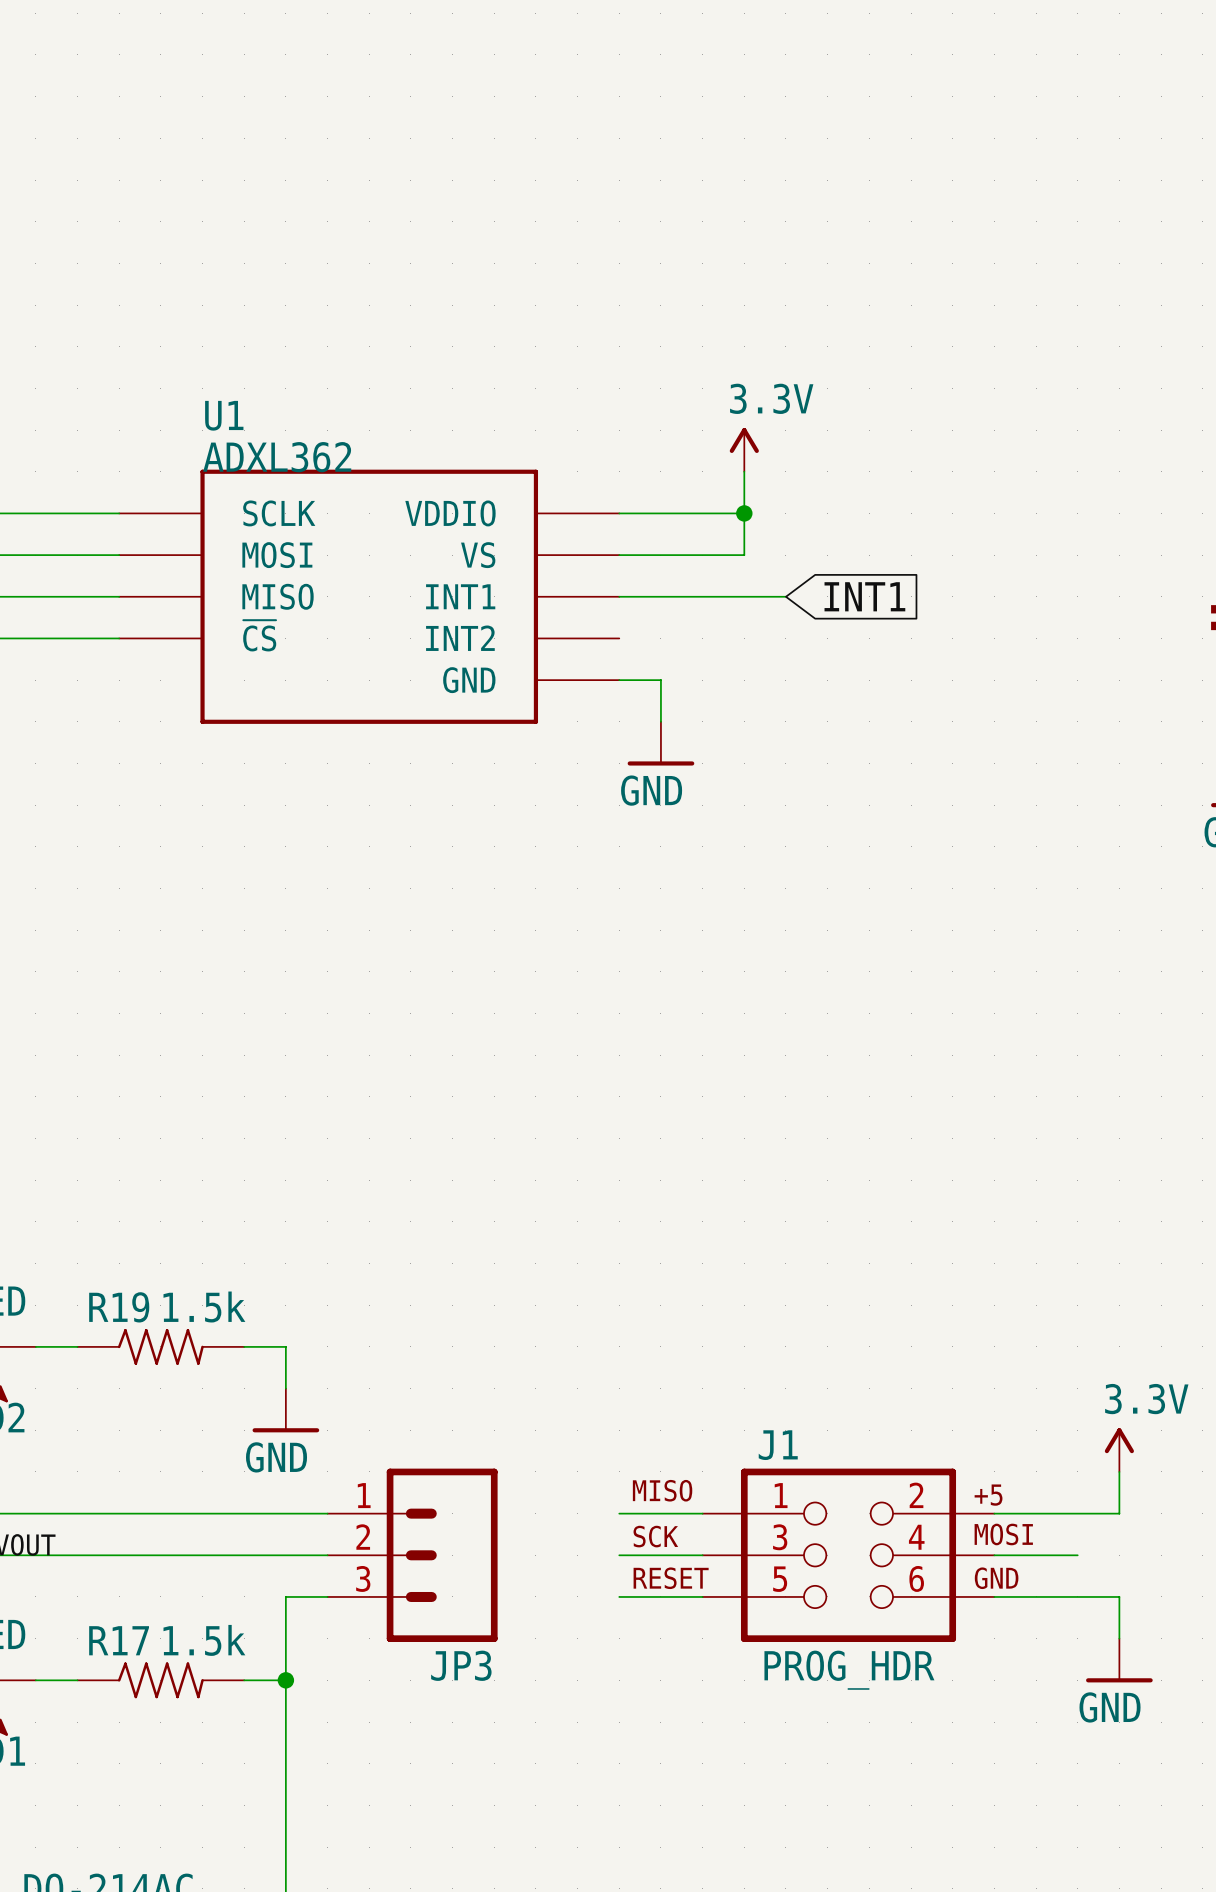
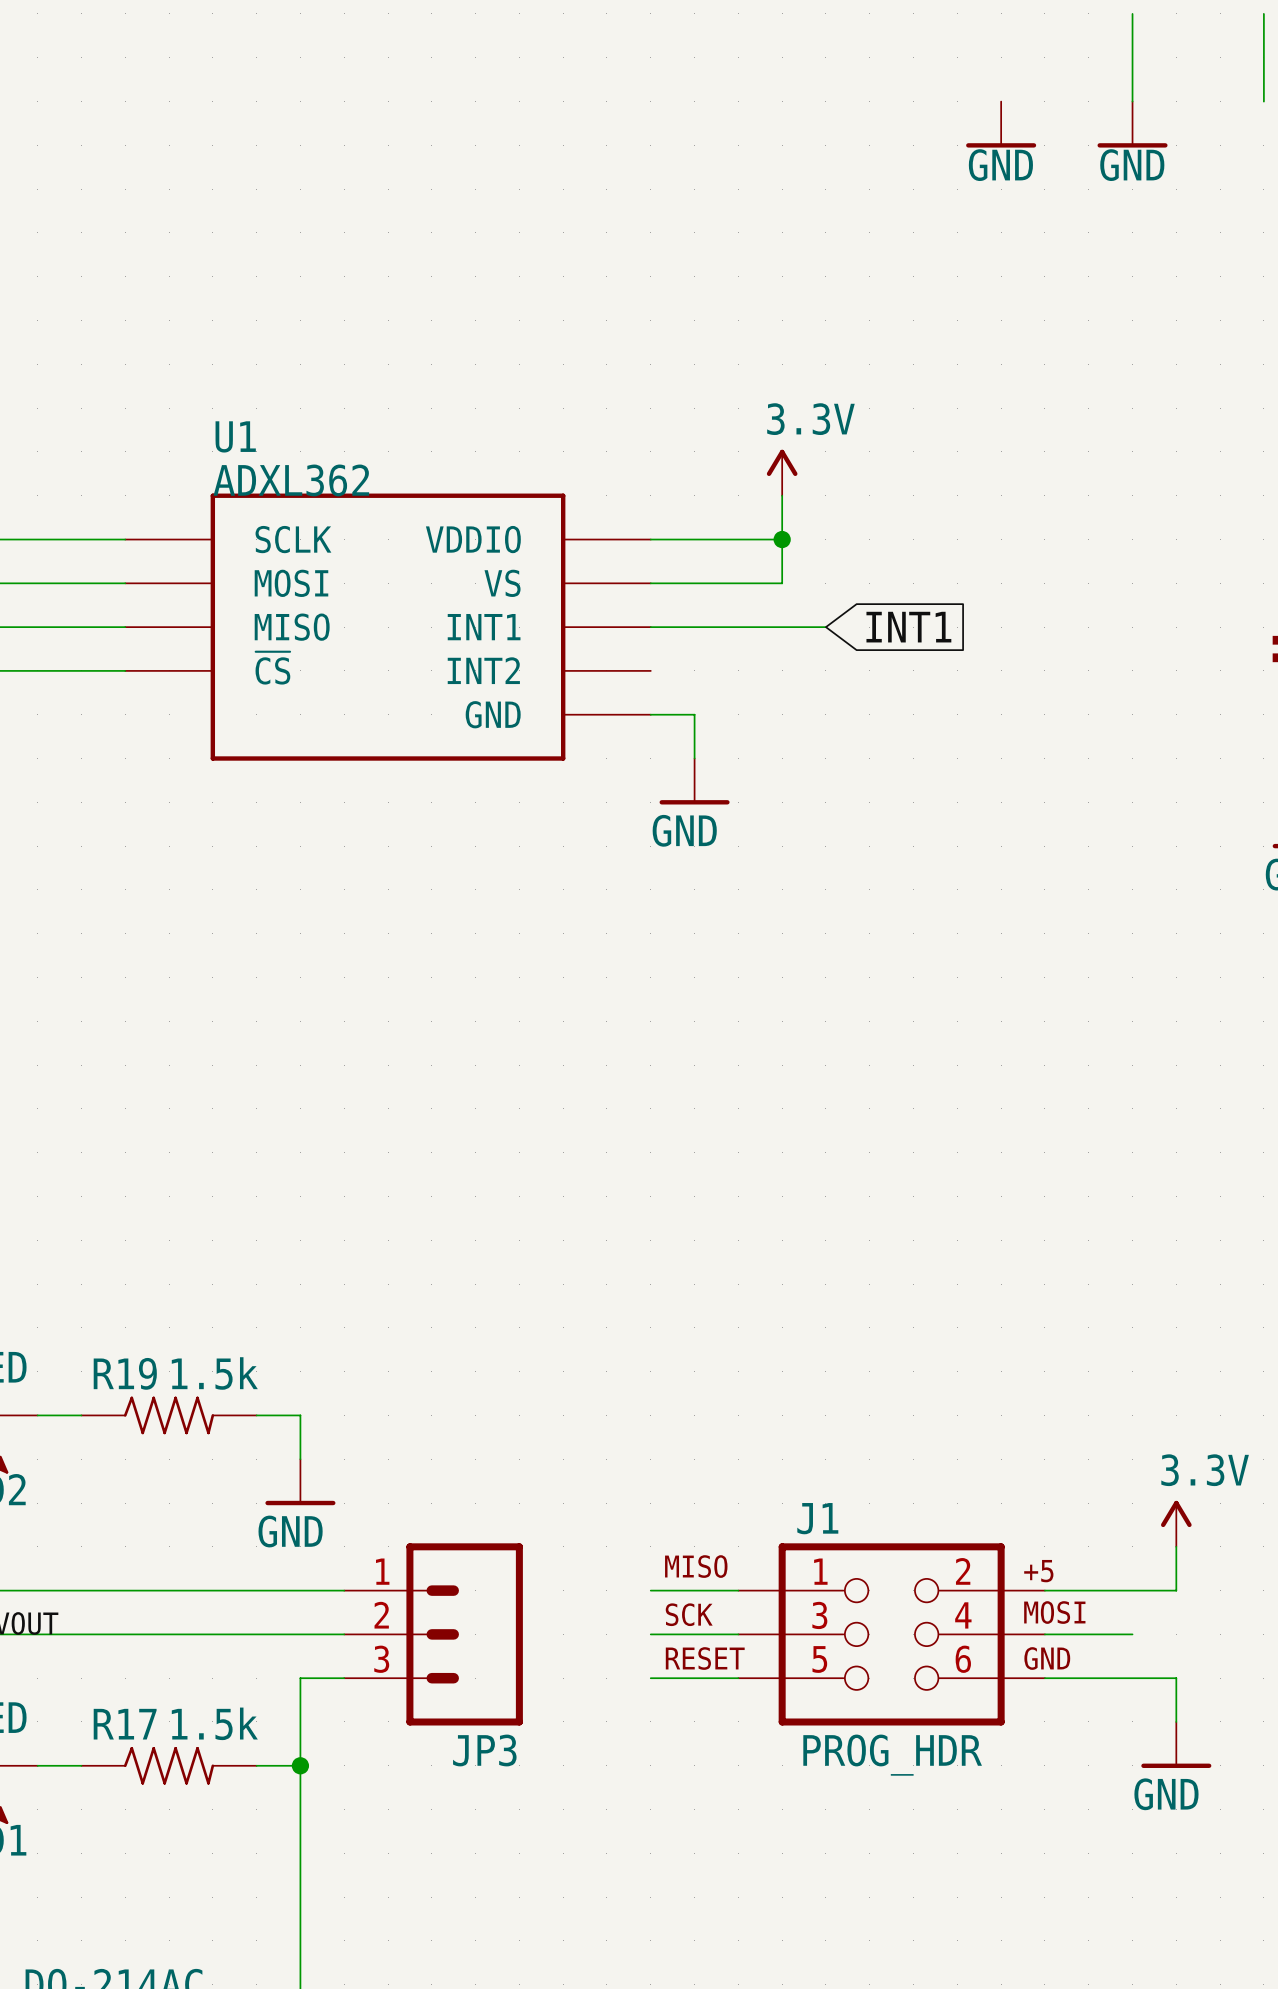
wire: none -> (1132, 13) (1132, 101)
wire: none -> (1263, 13) (1263, 101)
power symbol: none -> GND (1001, 124)
power symbol: none -> GND (1132, 124)

